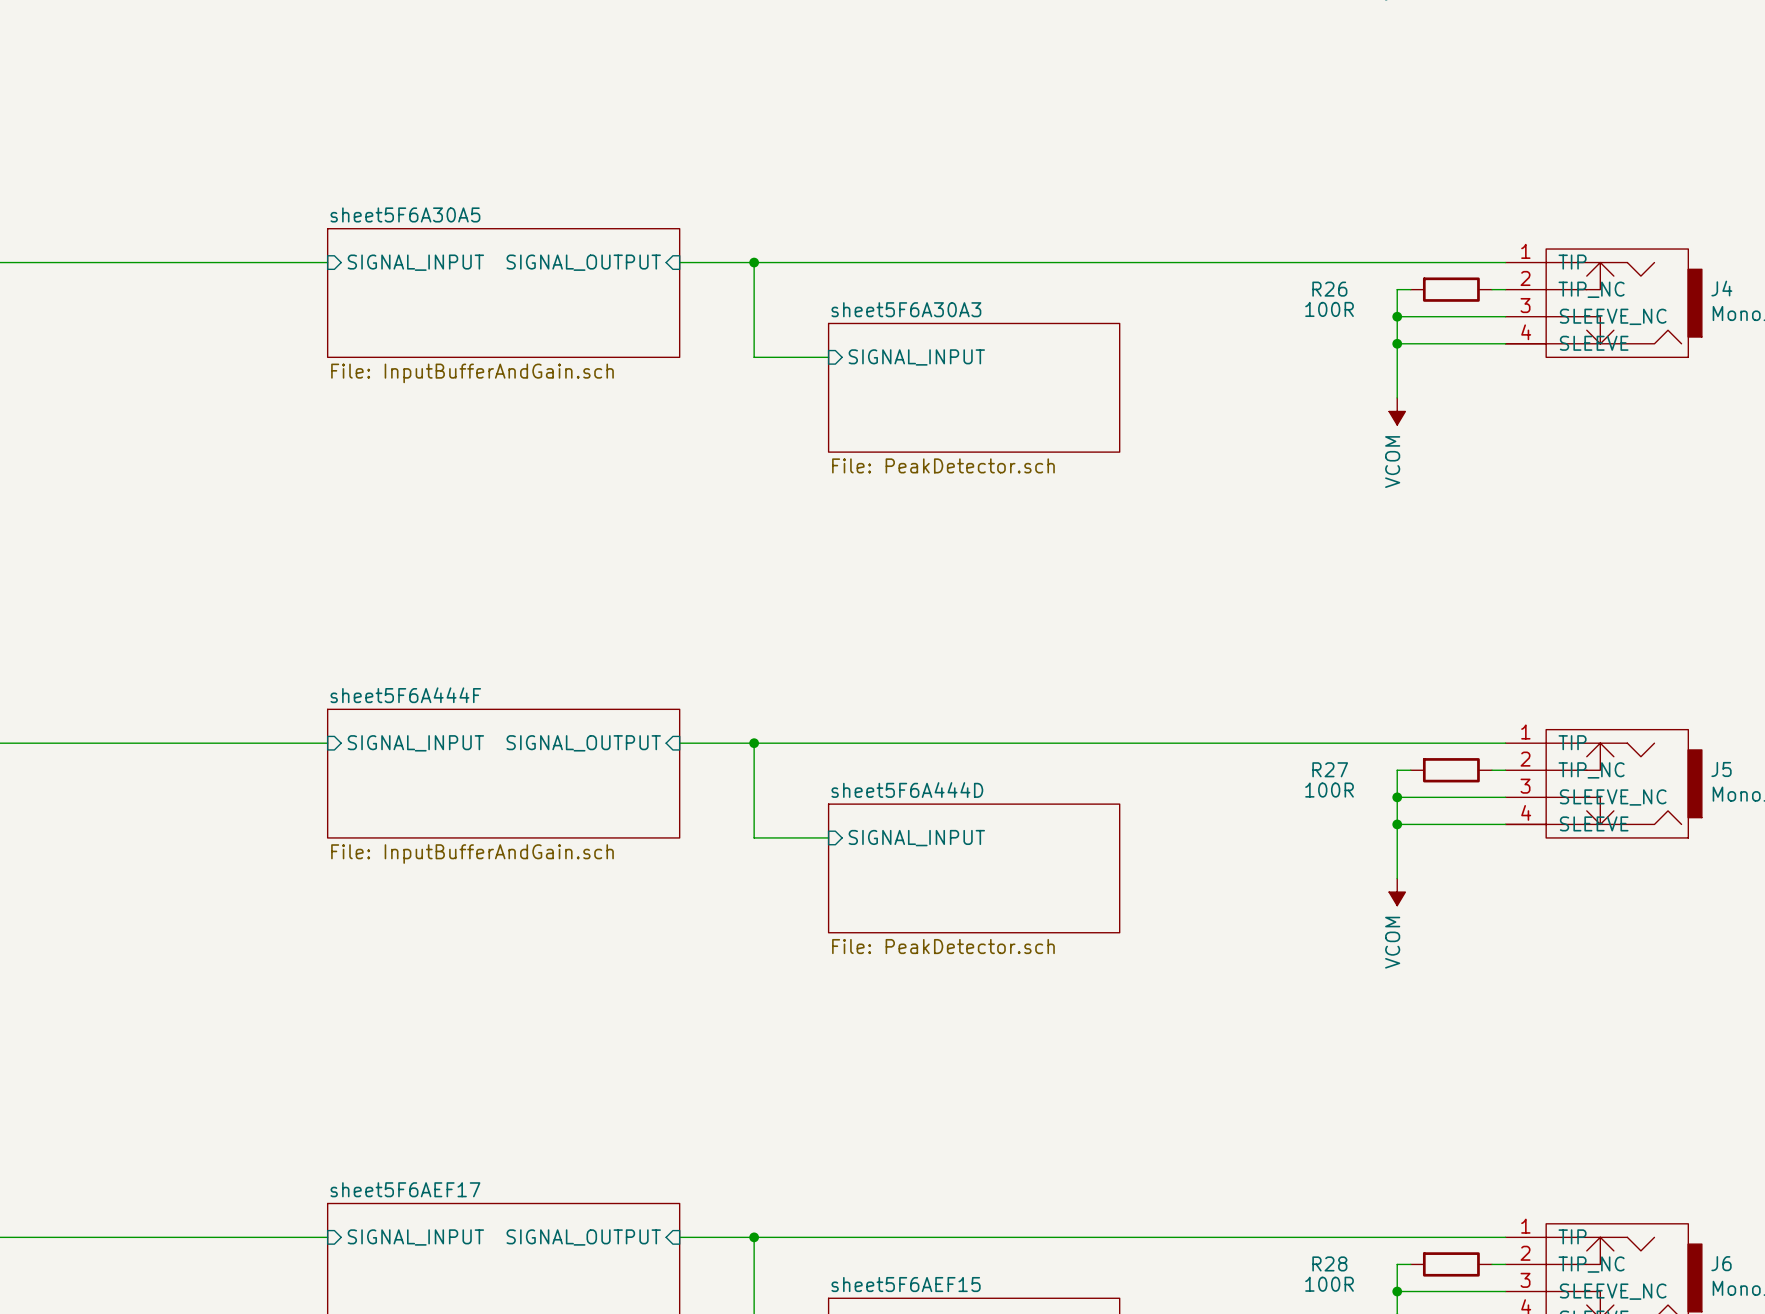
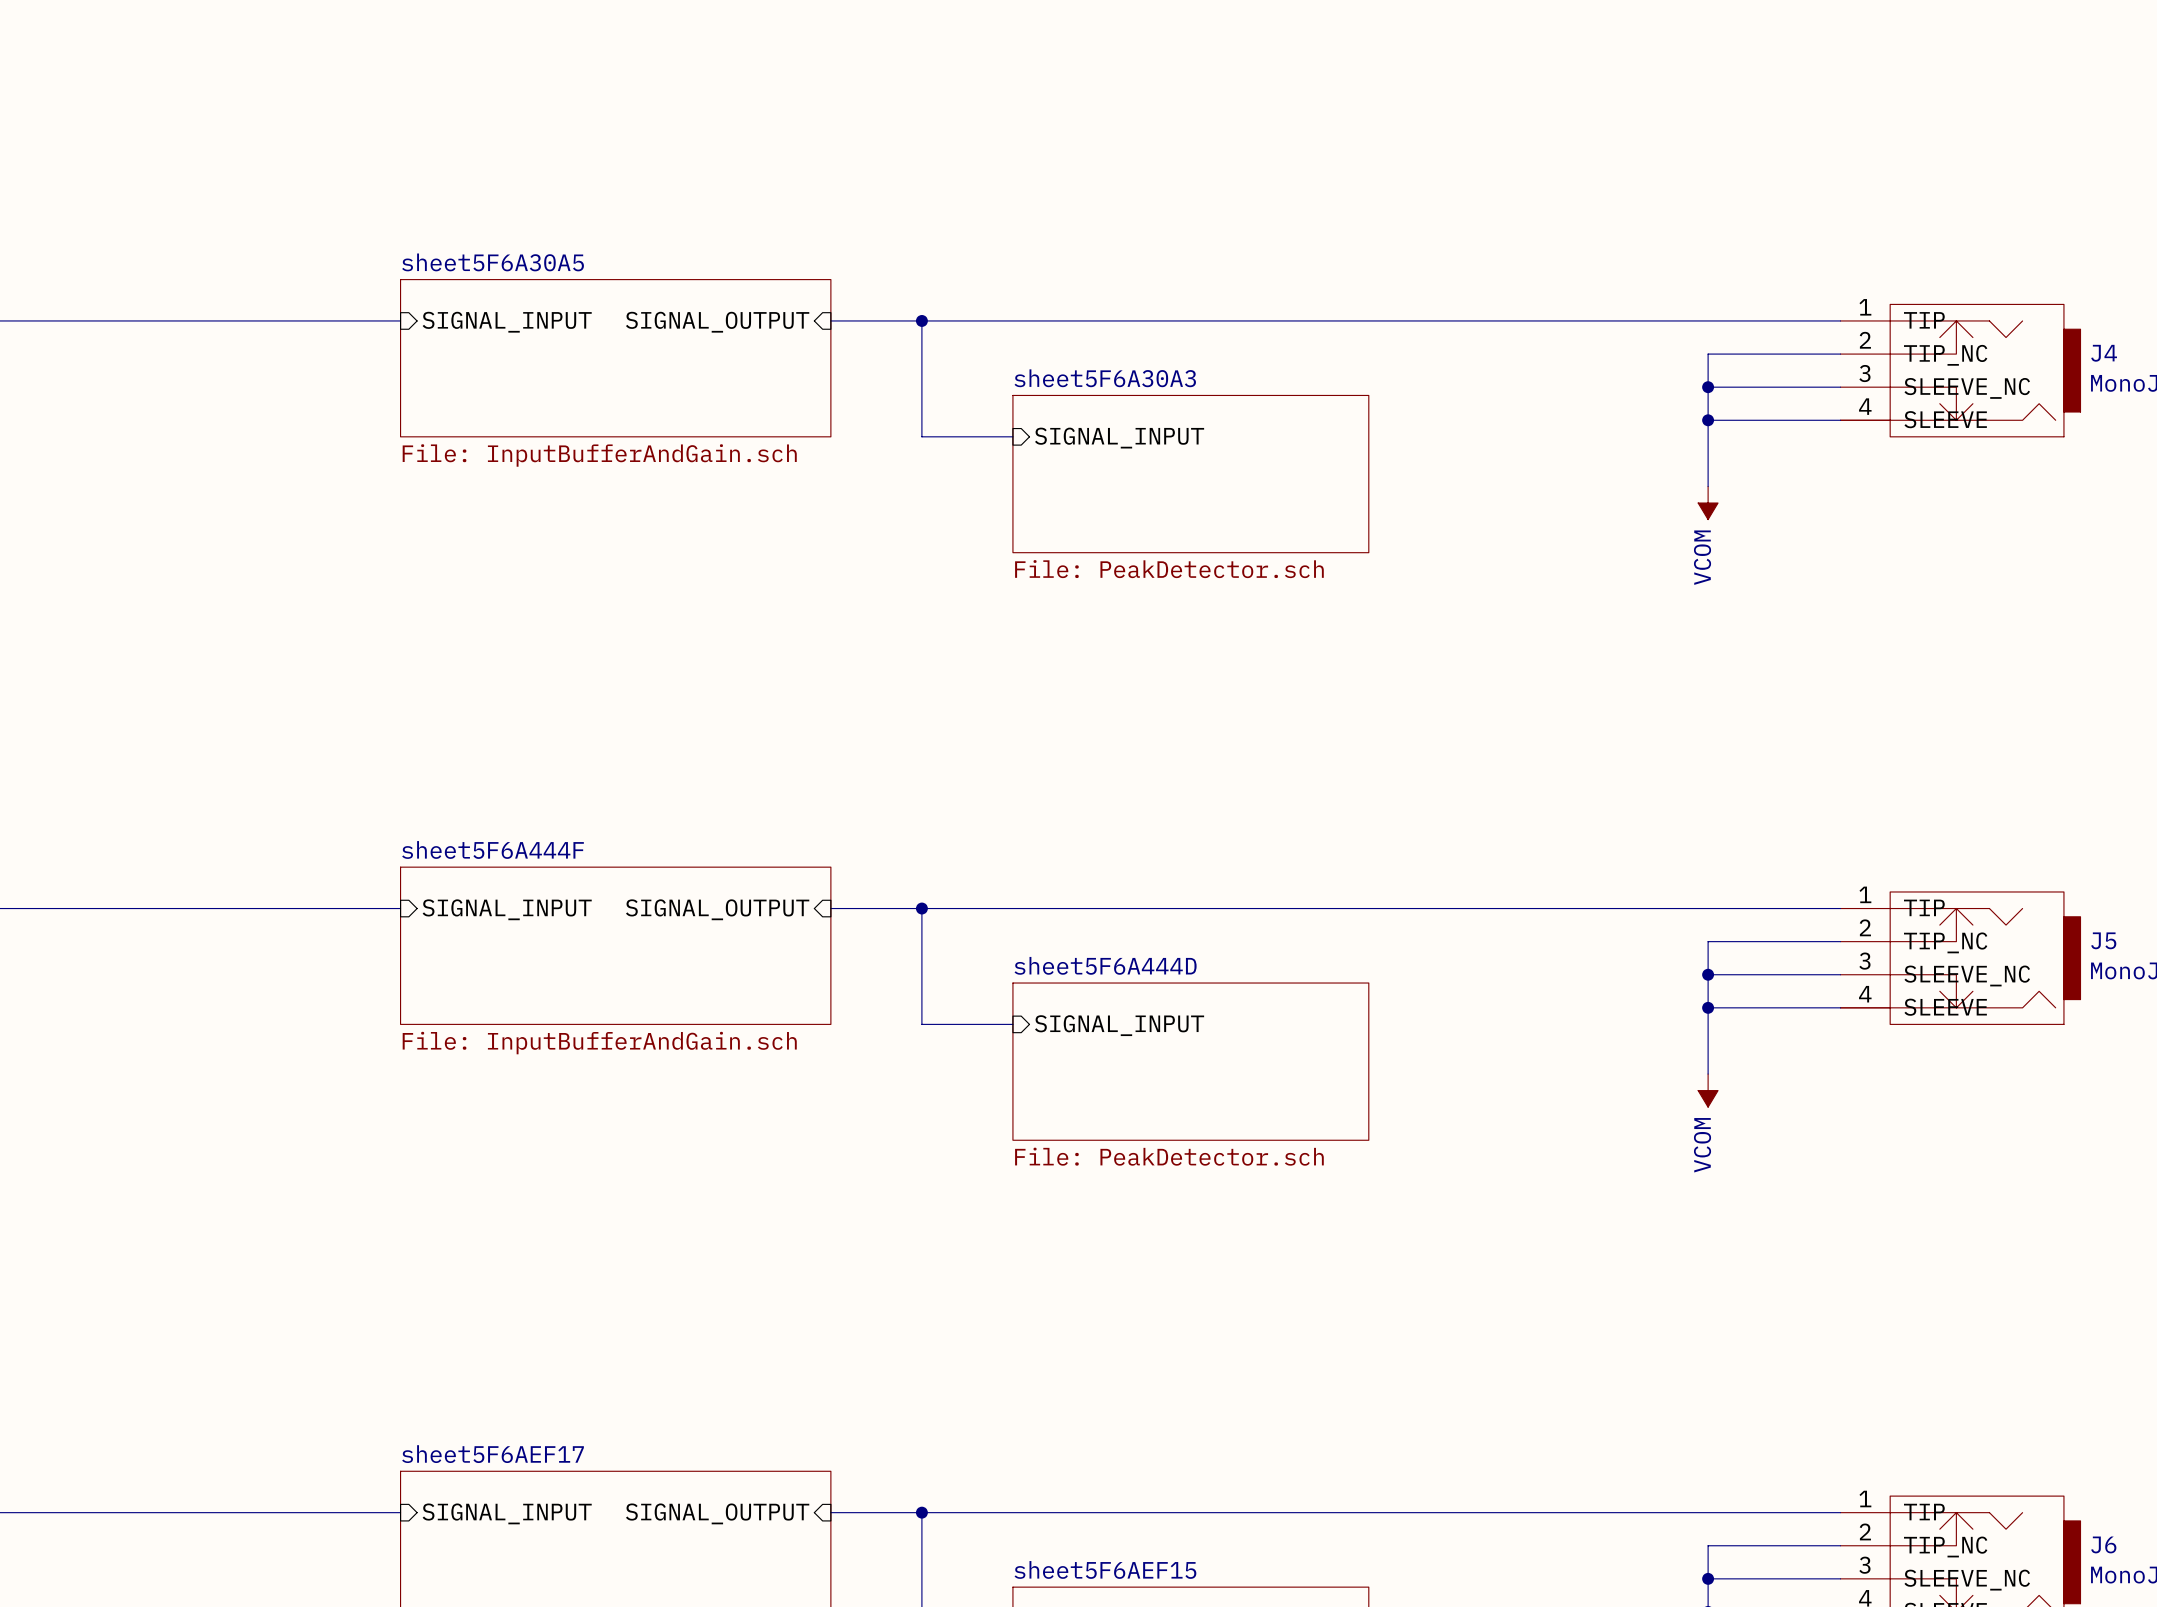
wire: none -> (1724, 354) (1823, 354)
R26: 100R (1451, 289) -> none
wire: none -> (1724, 941) (1823, 941)
R27: 100R (1451, 770) -> none
wire: none -> (1724, 1545) (1823, 1545)
R28: 100R (1451, 1264) -> none

